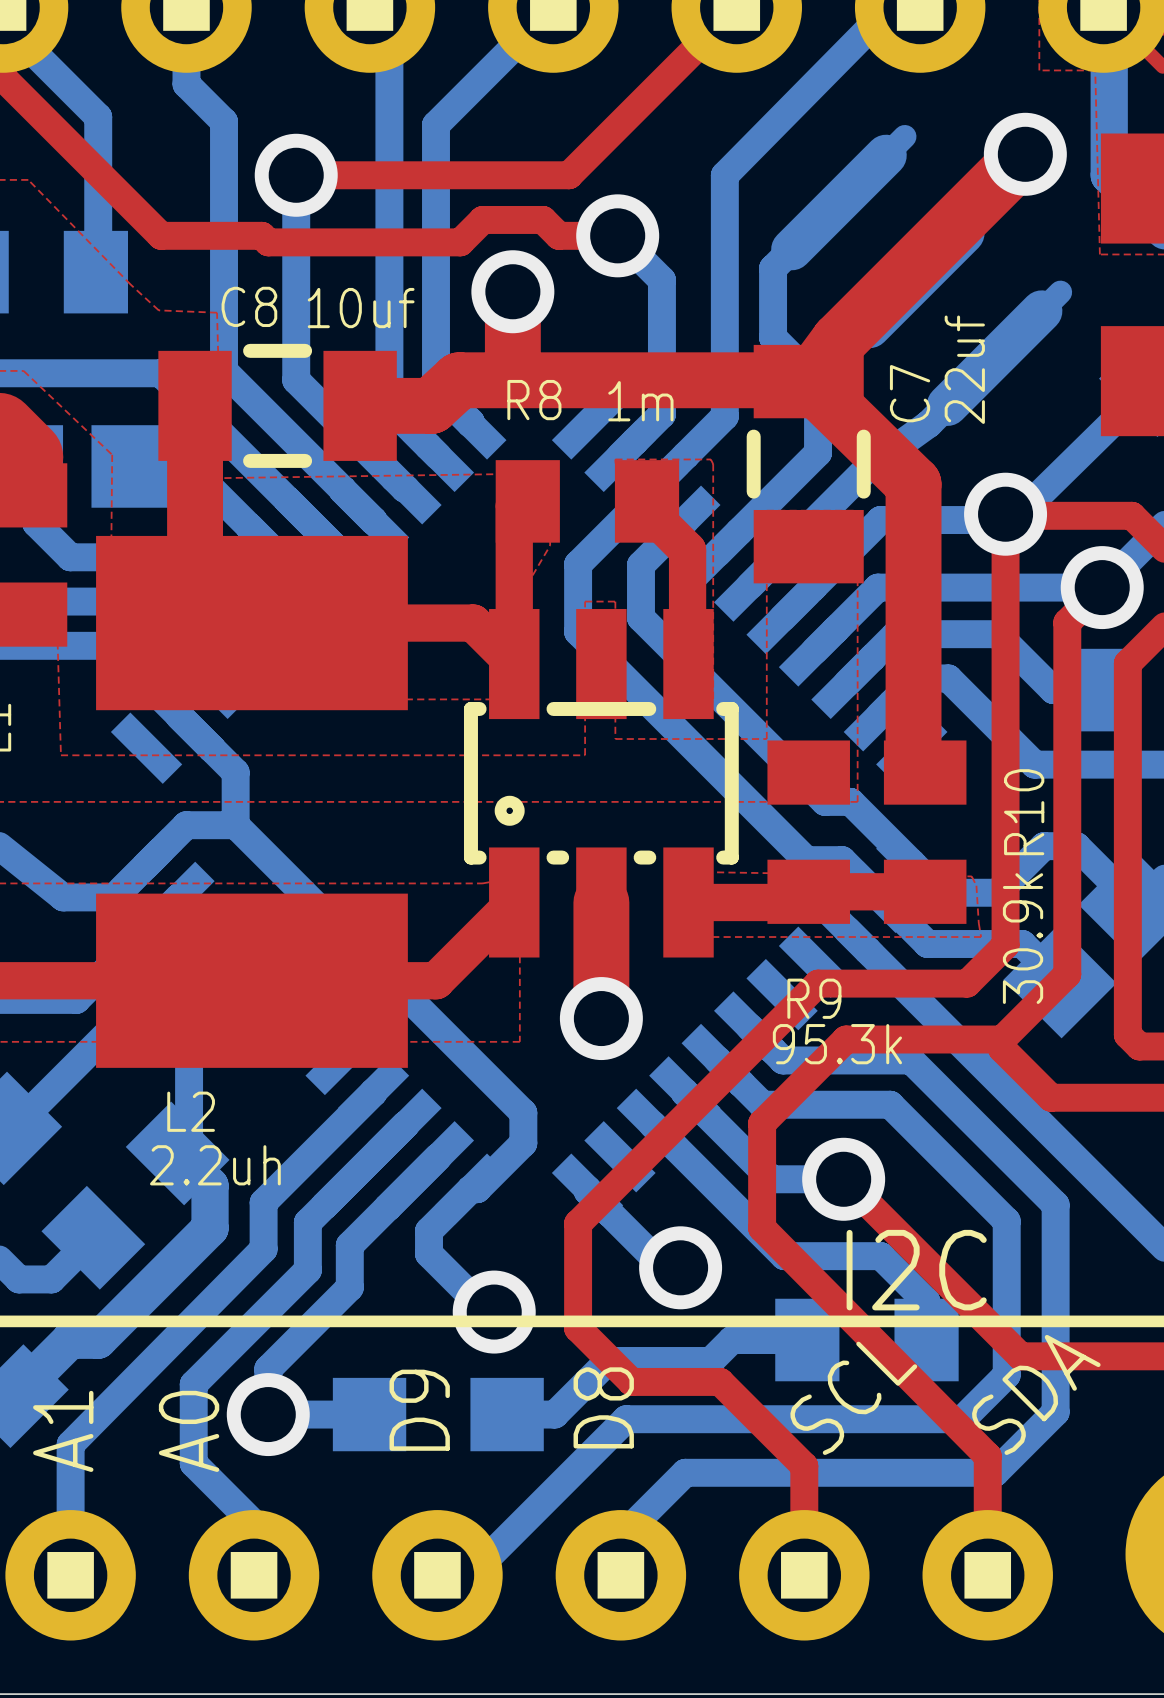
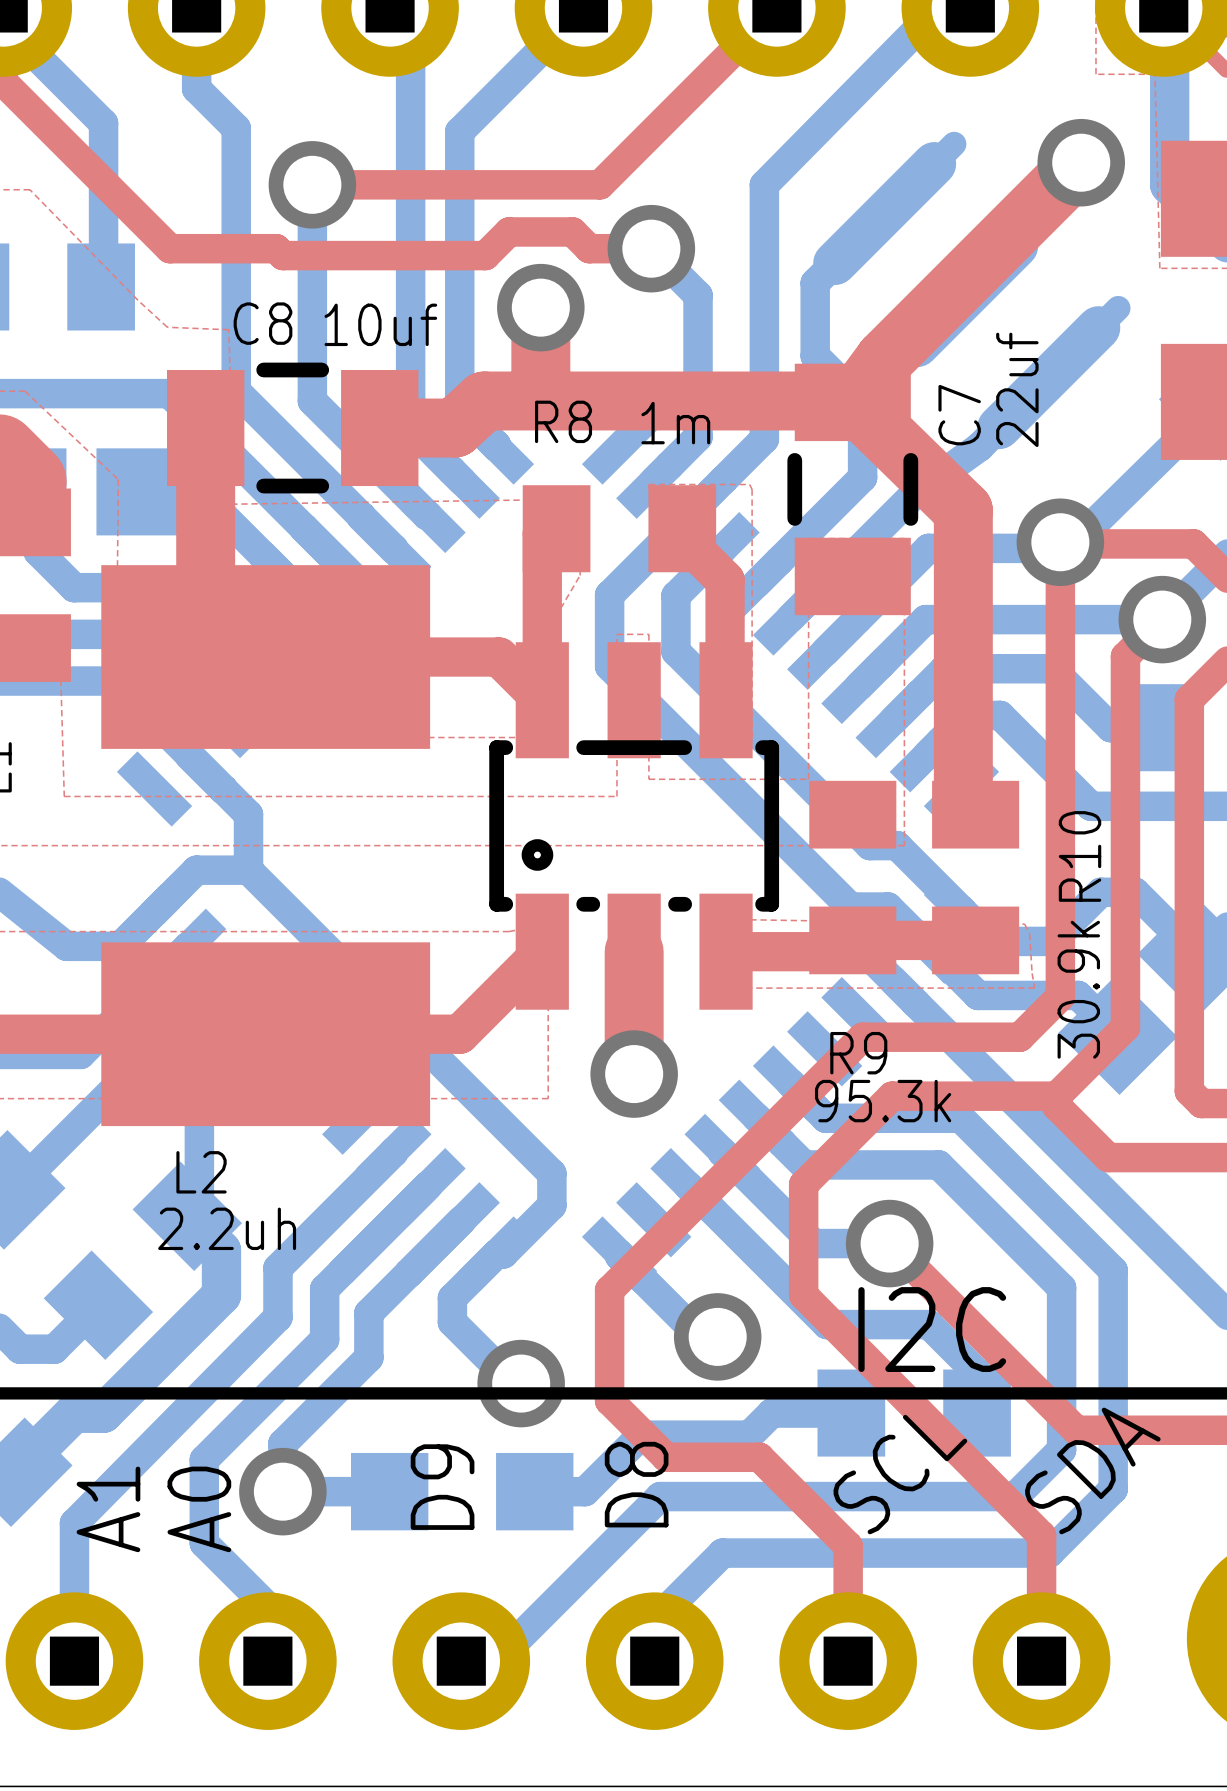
text position: I2C (916, 1270) -> I2C (932, 1329)
text position: A1 (63, 1431) -> A1 (108, 1509)

